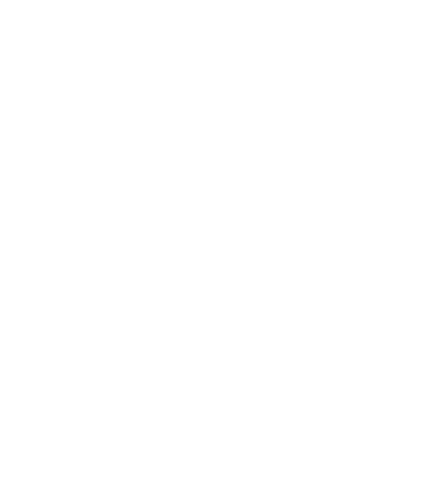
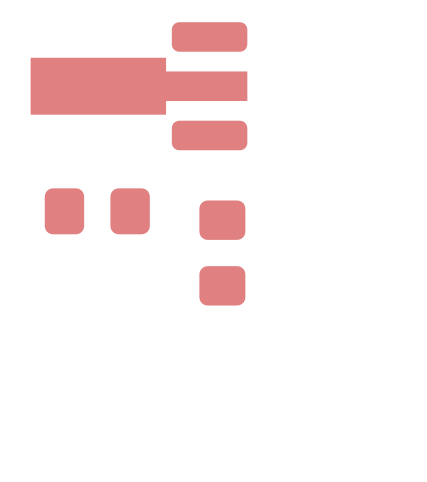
part: none -> (138, 86)
part: none -> (97, 211)
part: none -> (222, 253)

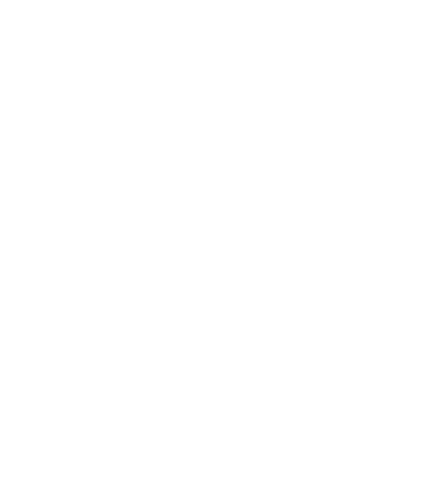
part: (138, 86) -> none
part: (97, 211) -> none
part: (222, 253) -> none

